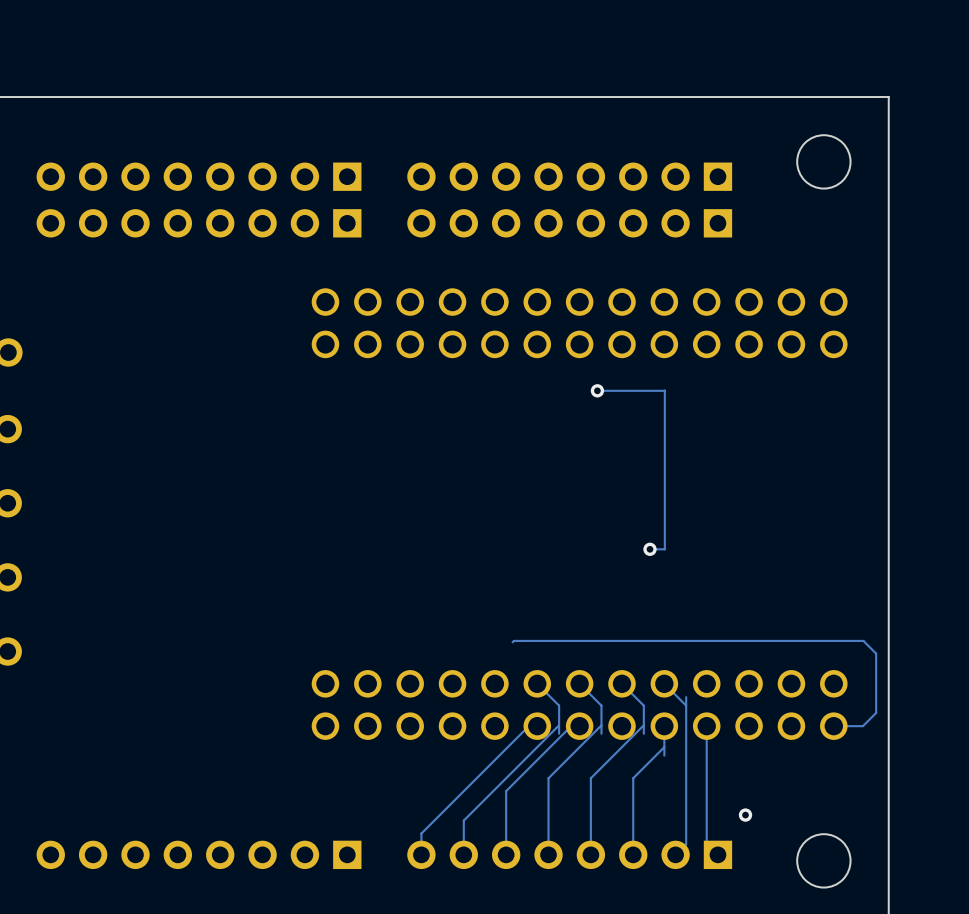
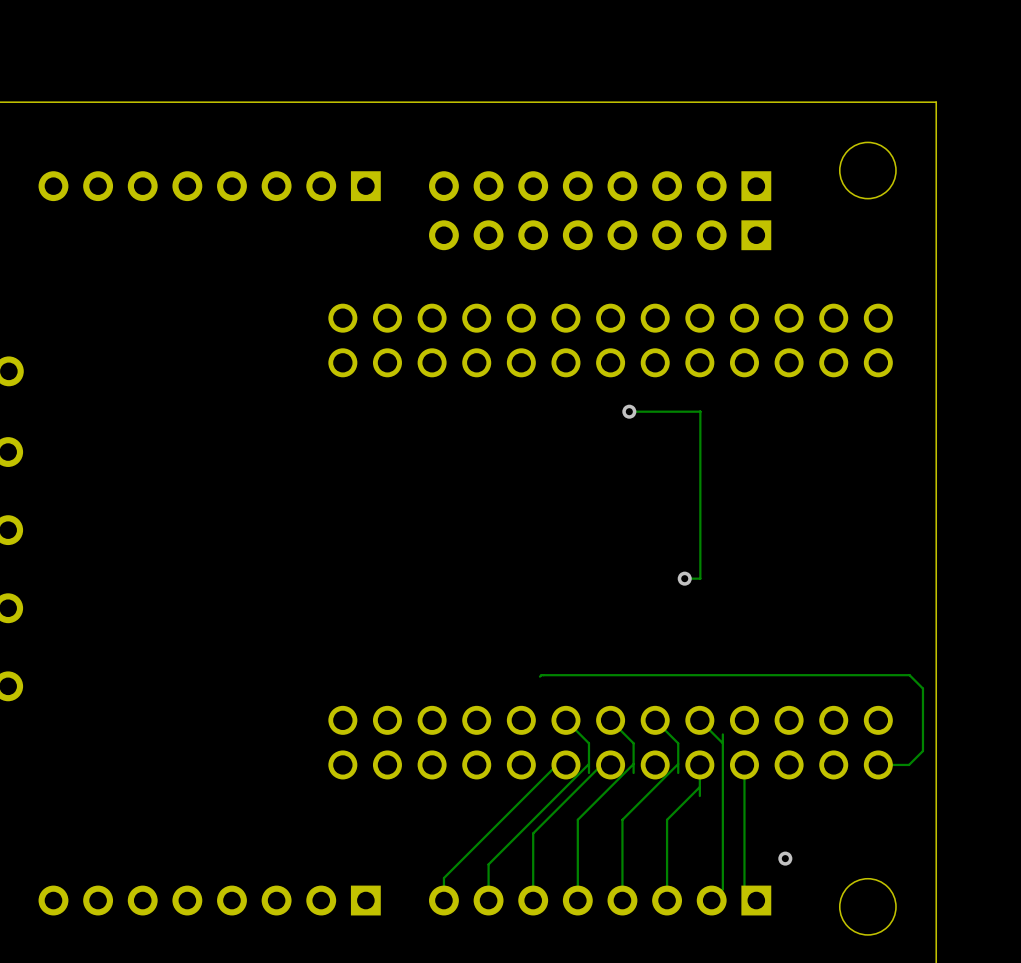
part: (199, 223) -> none

